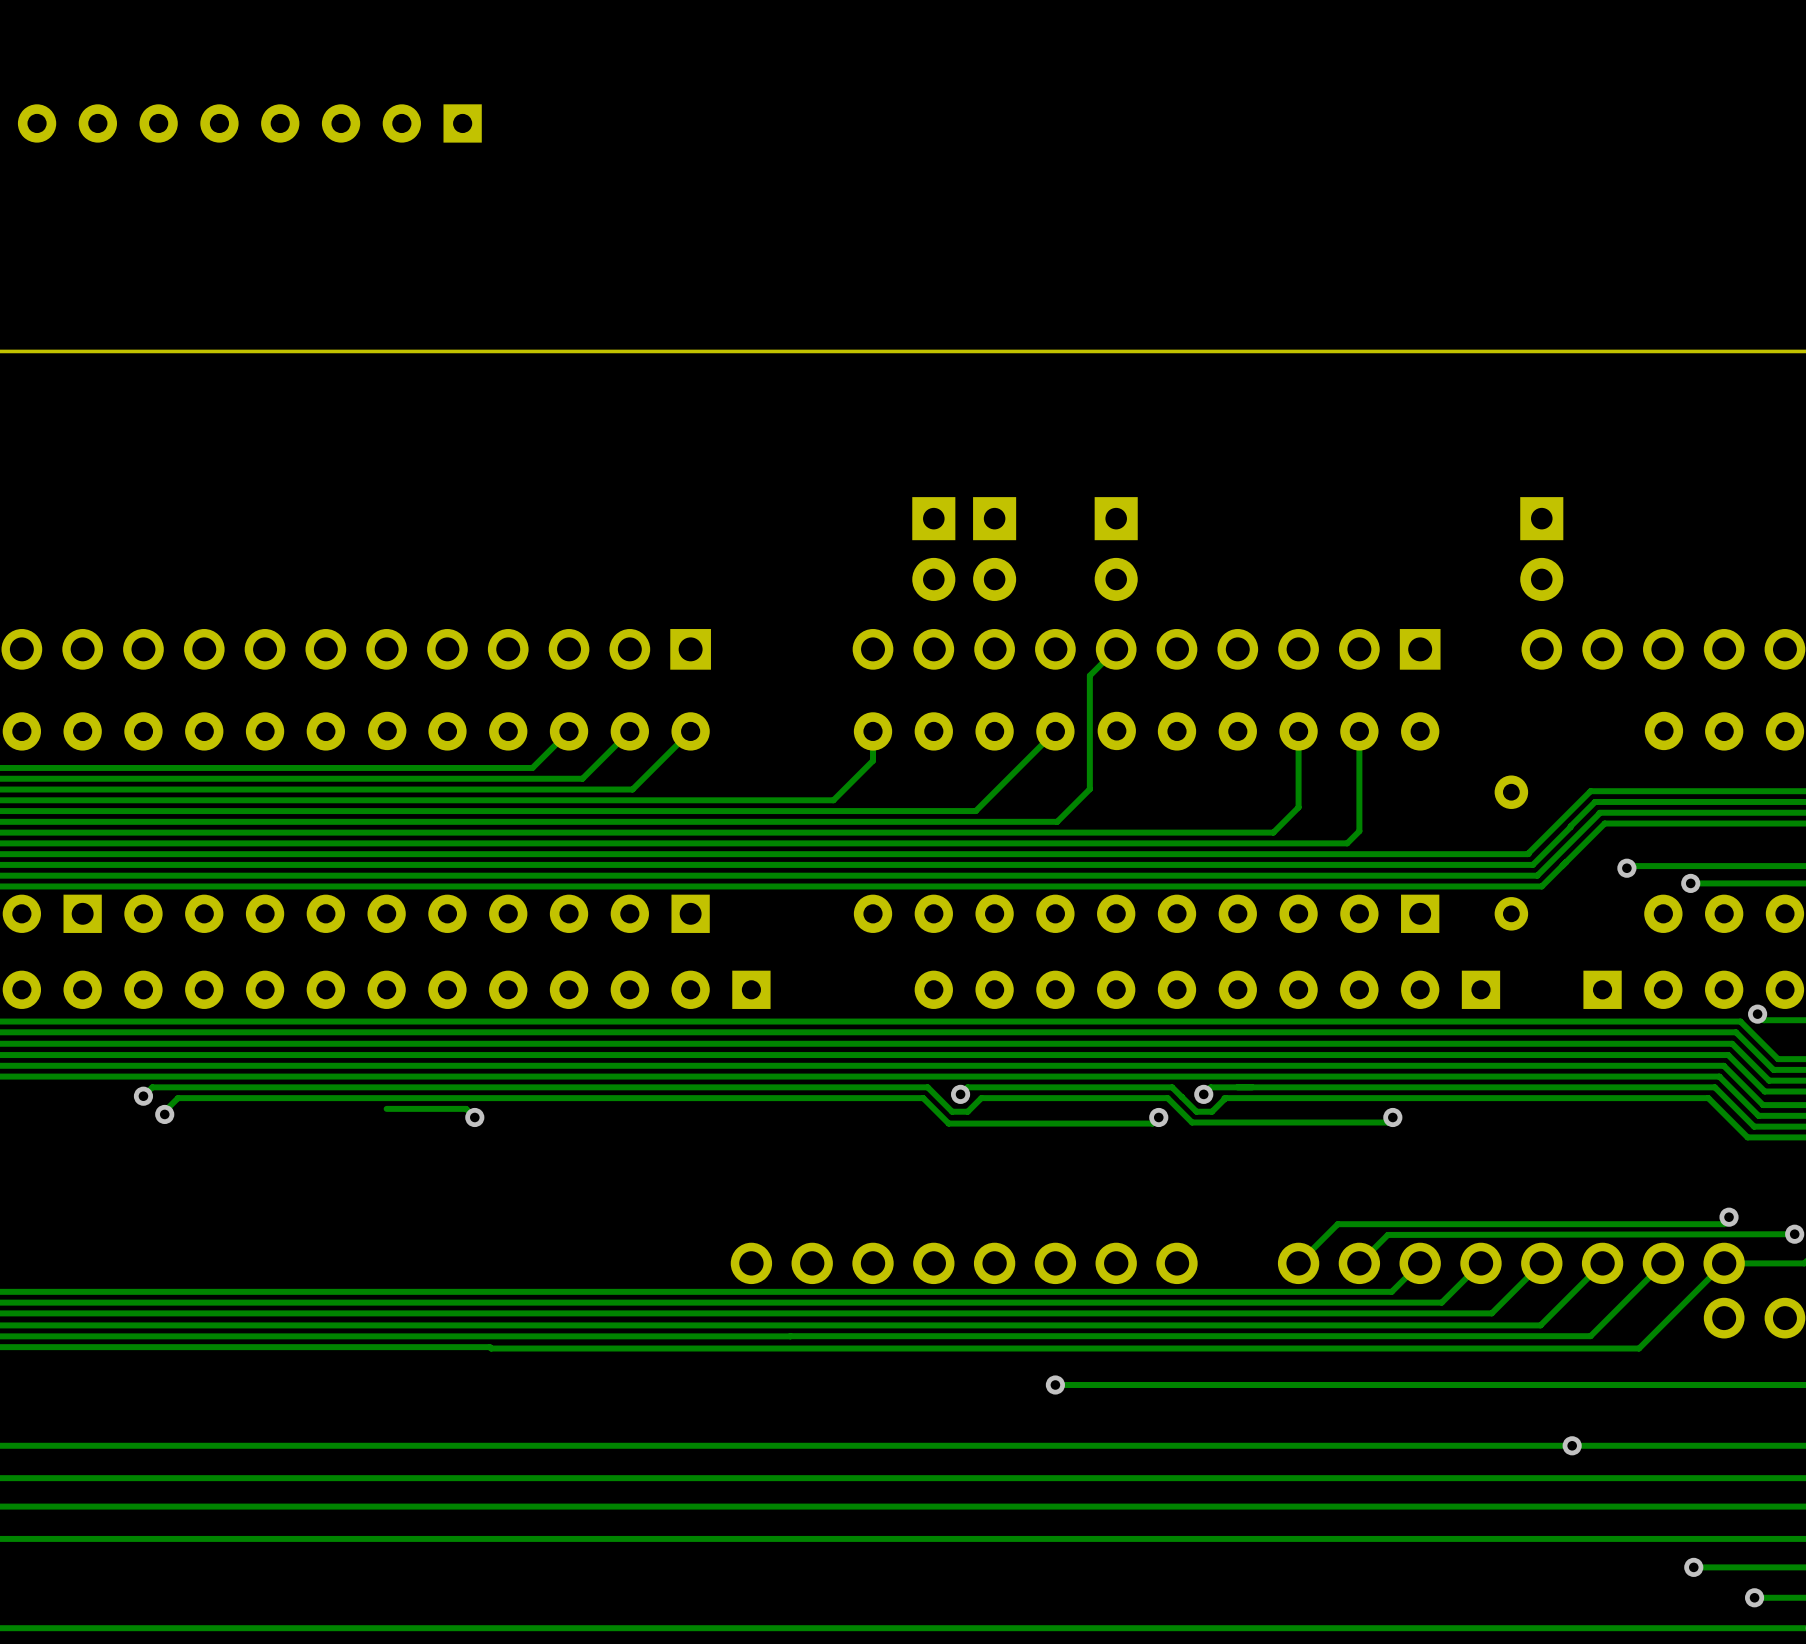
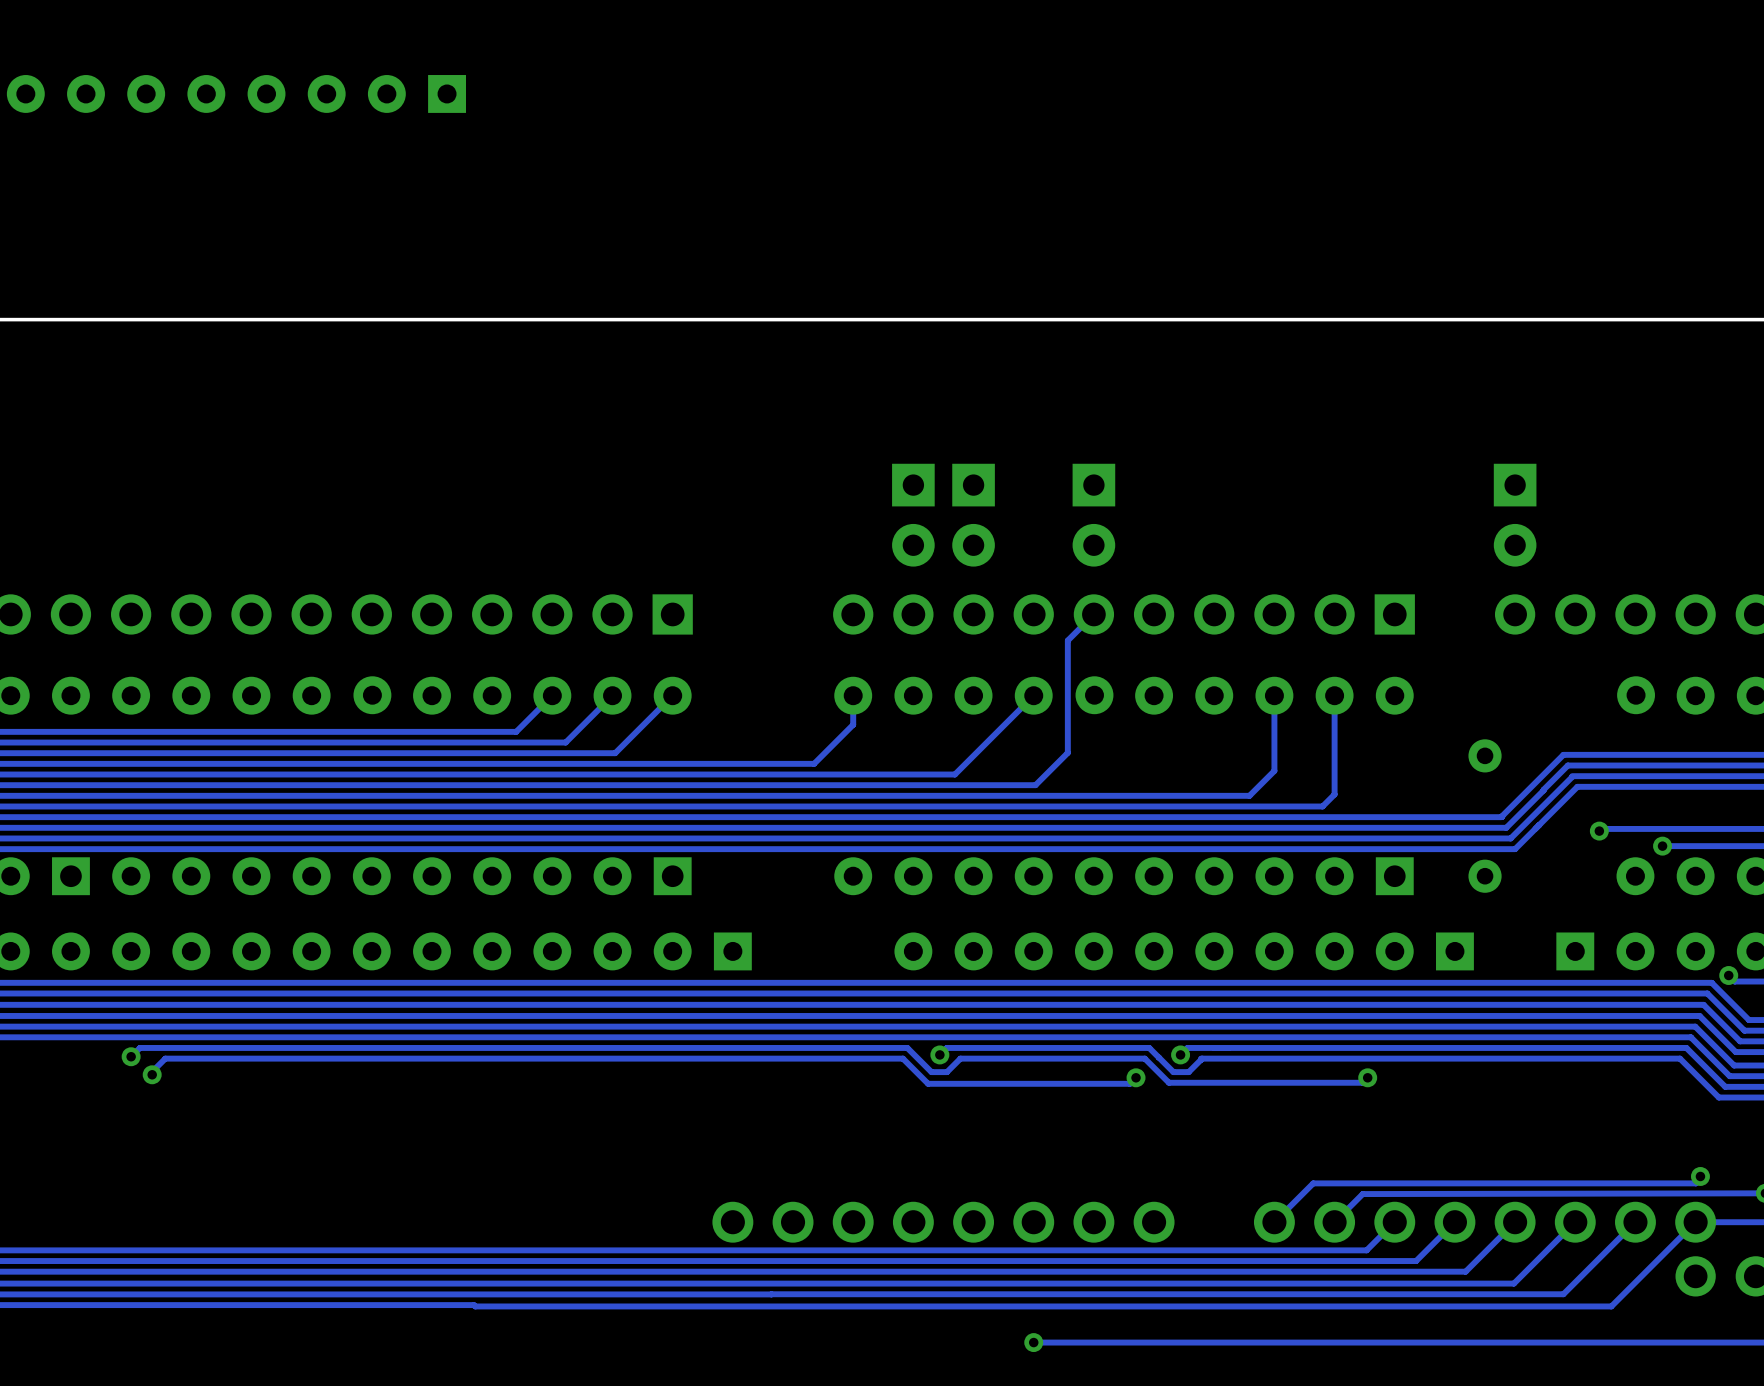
track: (386, 1108) (466, 1108) (474, 1117) -> none
via: (474, 1117) -> none

